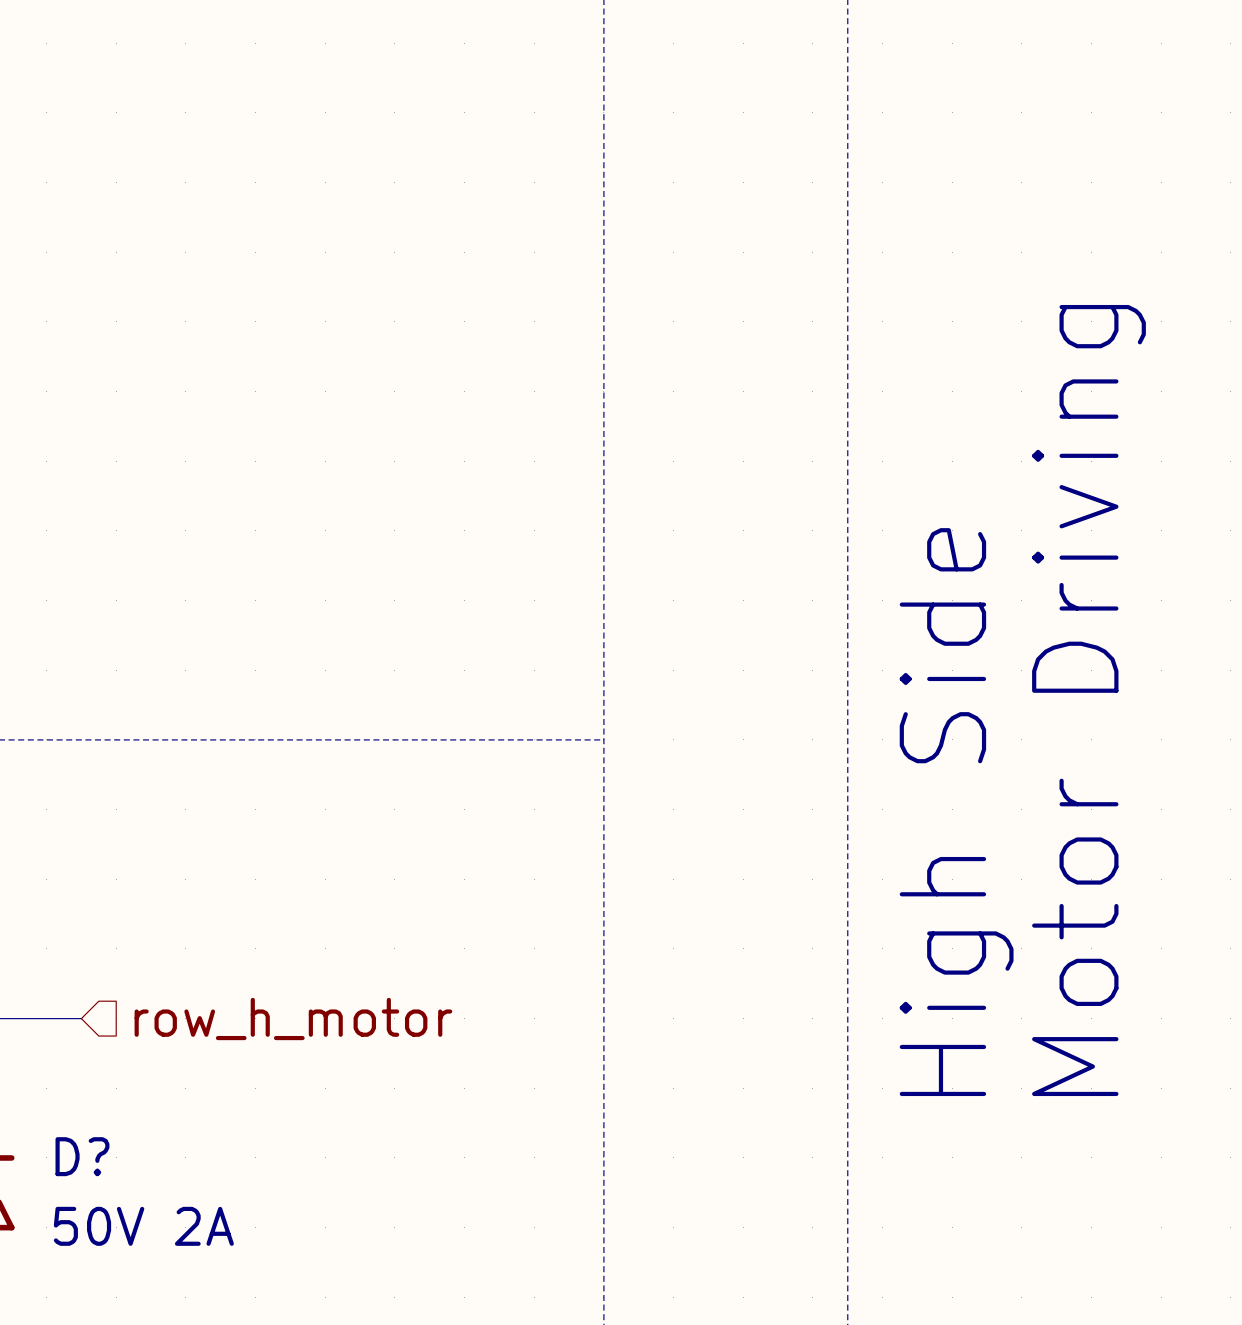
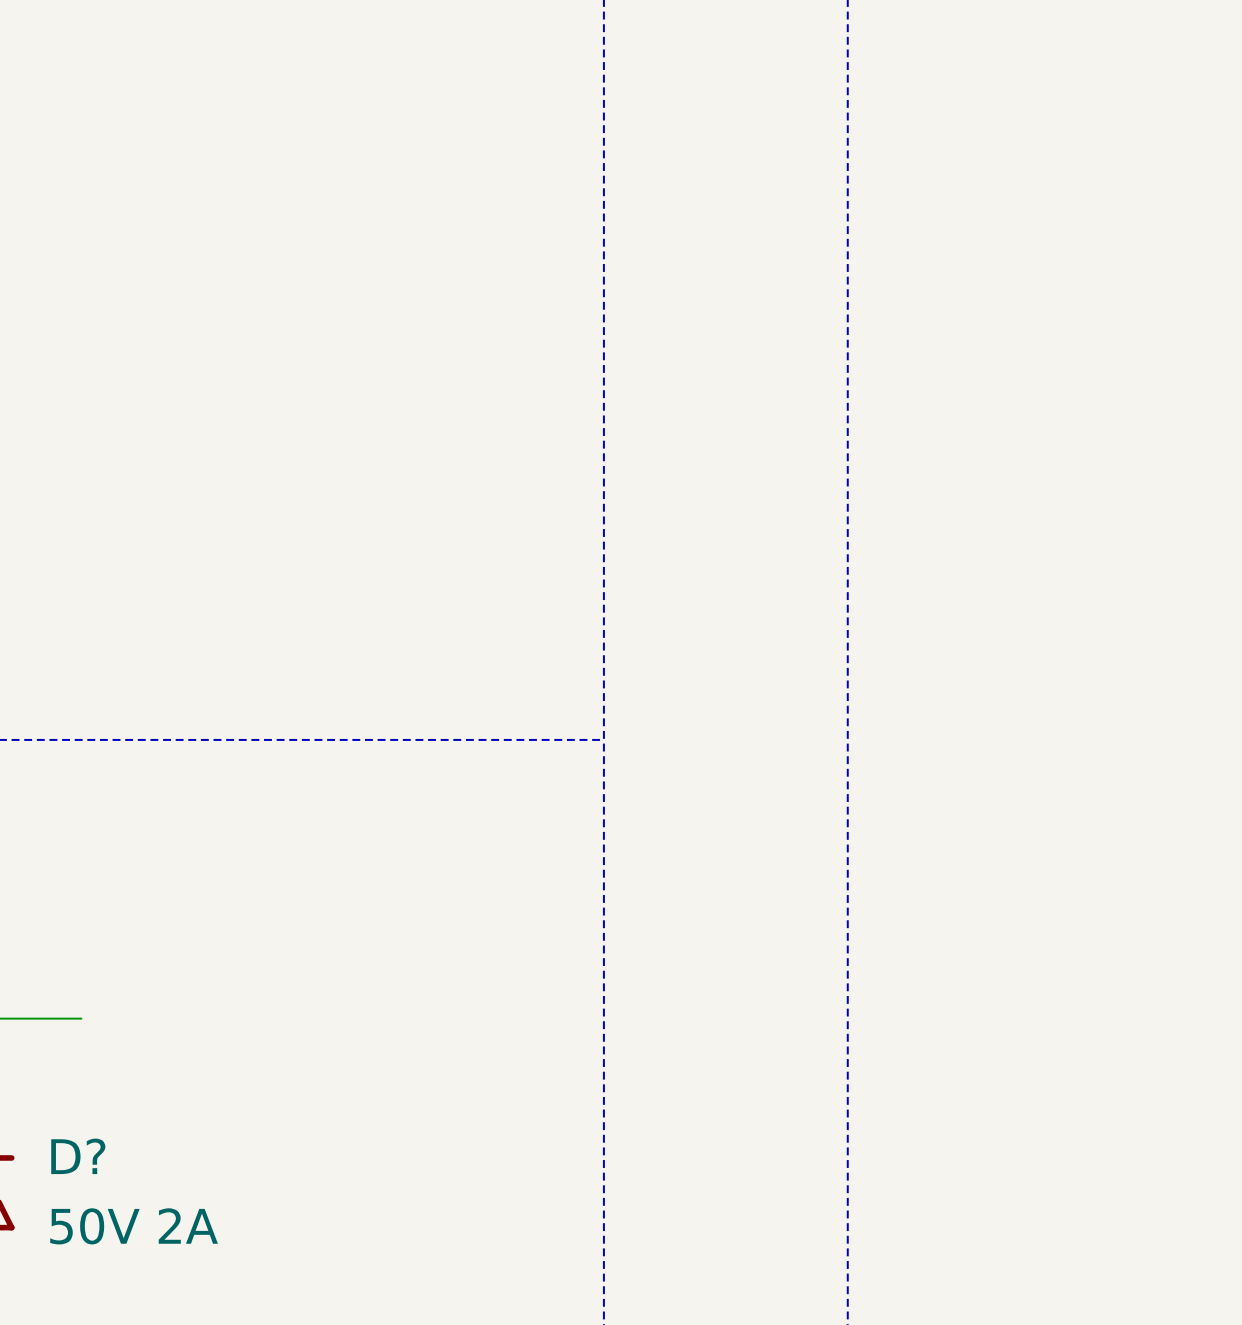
text: Motor Driving (1088, 700) -> none
text: High Side (956, 812) -> none
hierarchical label: row_h_motor (293, 1018) -> none

